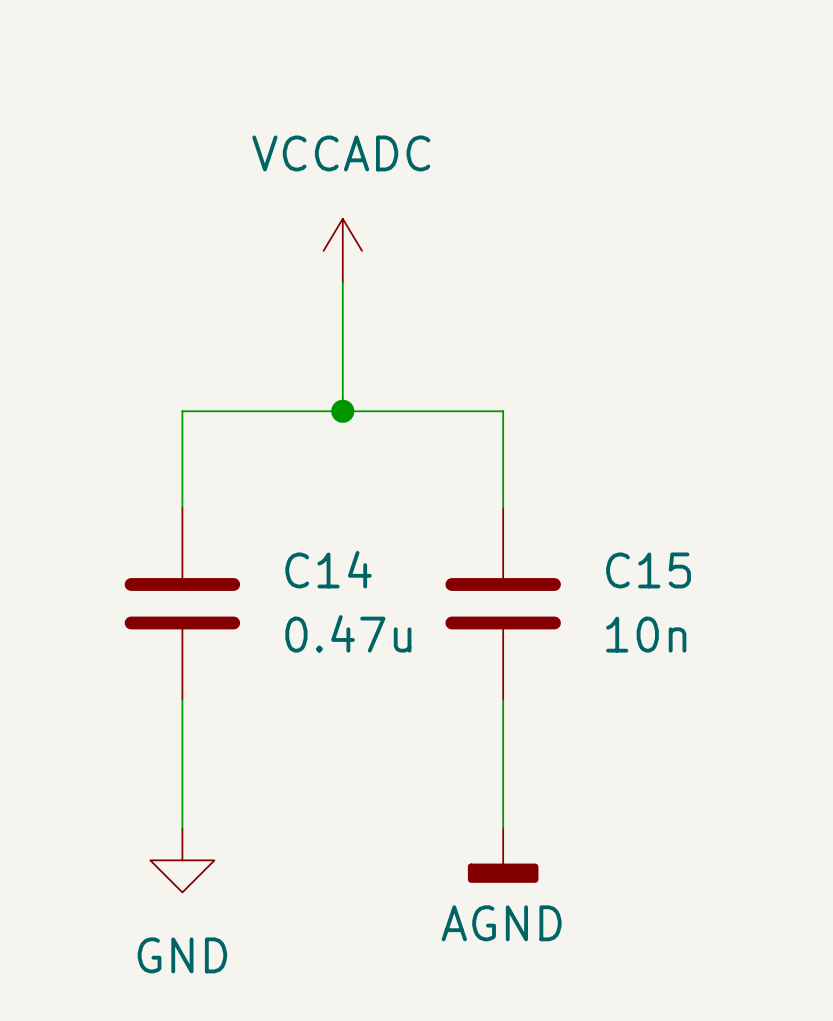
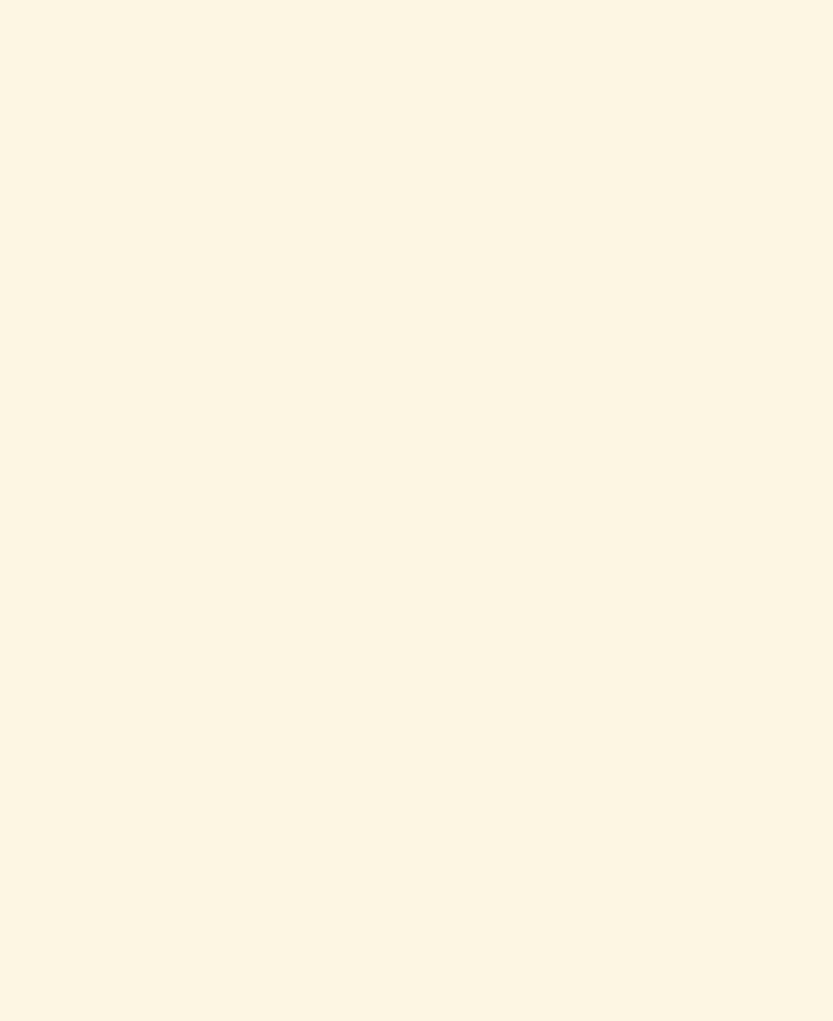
power symbol: VCCADC (342, 250) -> none
wire: (342, 282) (342, 411) -> none
junction: (342, 411) -> none
wire: (182, 507) (182, 411) (503, 411) (503, 507) -> none
C14: 0.47u (182, 603) -> none
C15: 10n (503, 603) -> none
wire: (182, 699) (182, 828) -> none
wire: (503, 699) (503, 828) -> none
power symbol: AGND (503, 855) -> none
power symbol: GND (182, 860) -> none

